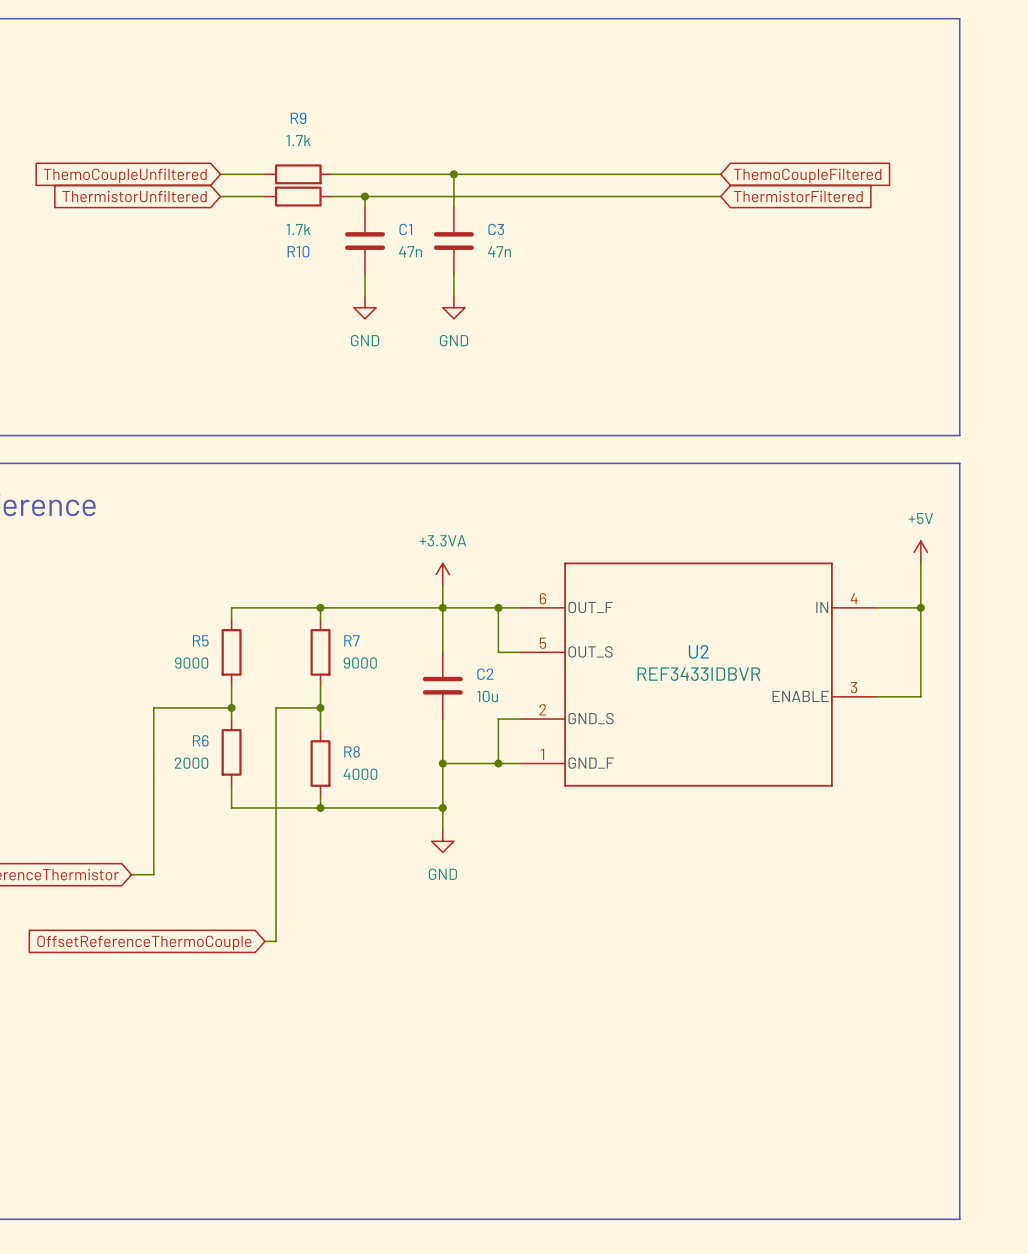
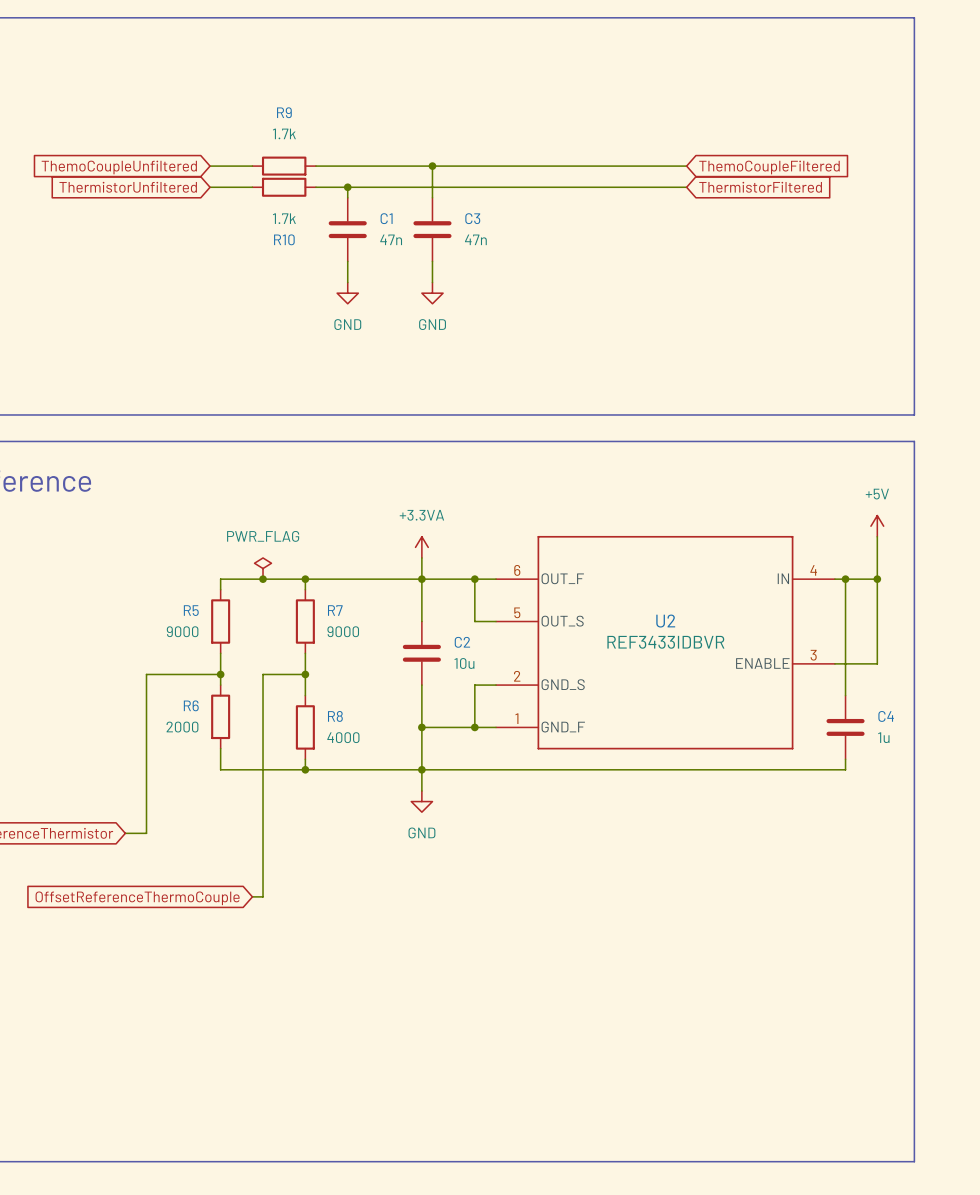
power symbol: none -> PWR_FLAG (263, 568)
junction: none -> (263, 579)
wire: none -> (845, 579) (845, 695)
junction: none -> (845, 579)
C4: none -> 1u (845, 727)
wire: none -> (845, 759) (845, 769) (421, 769)

